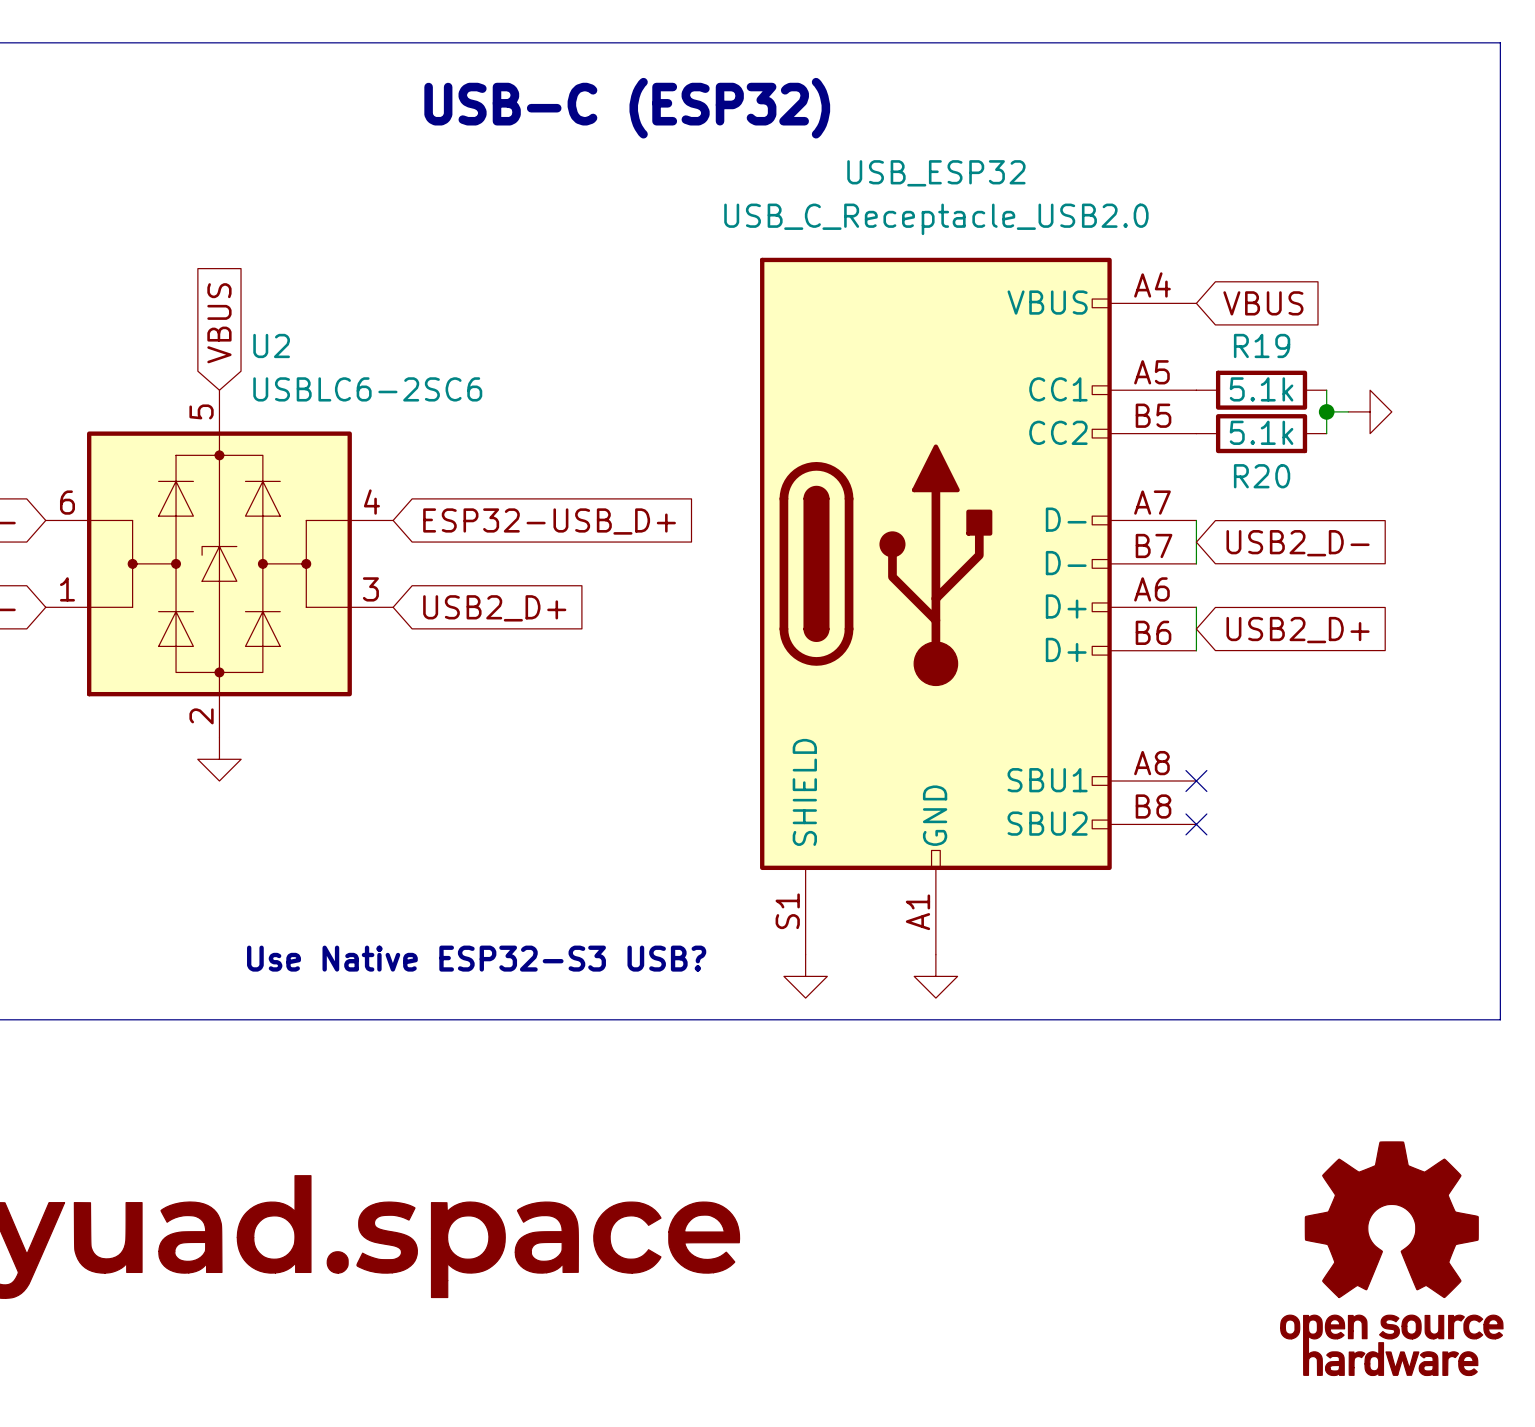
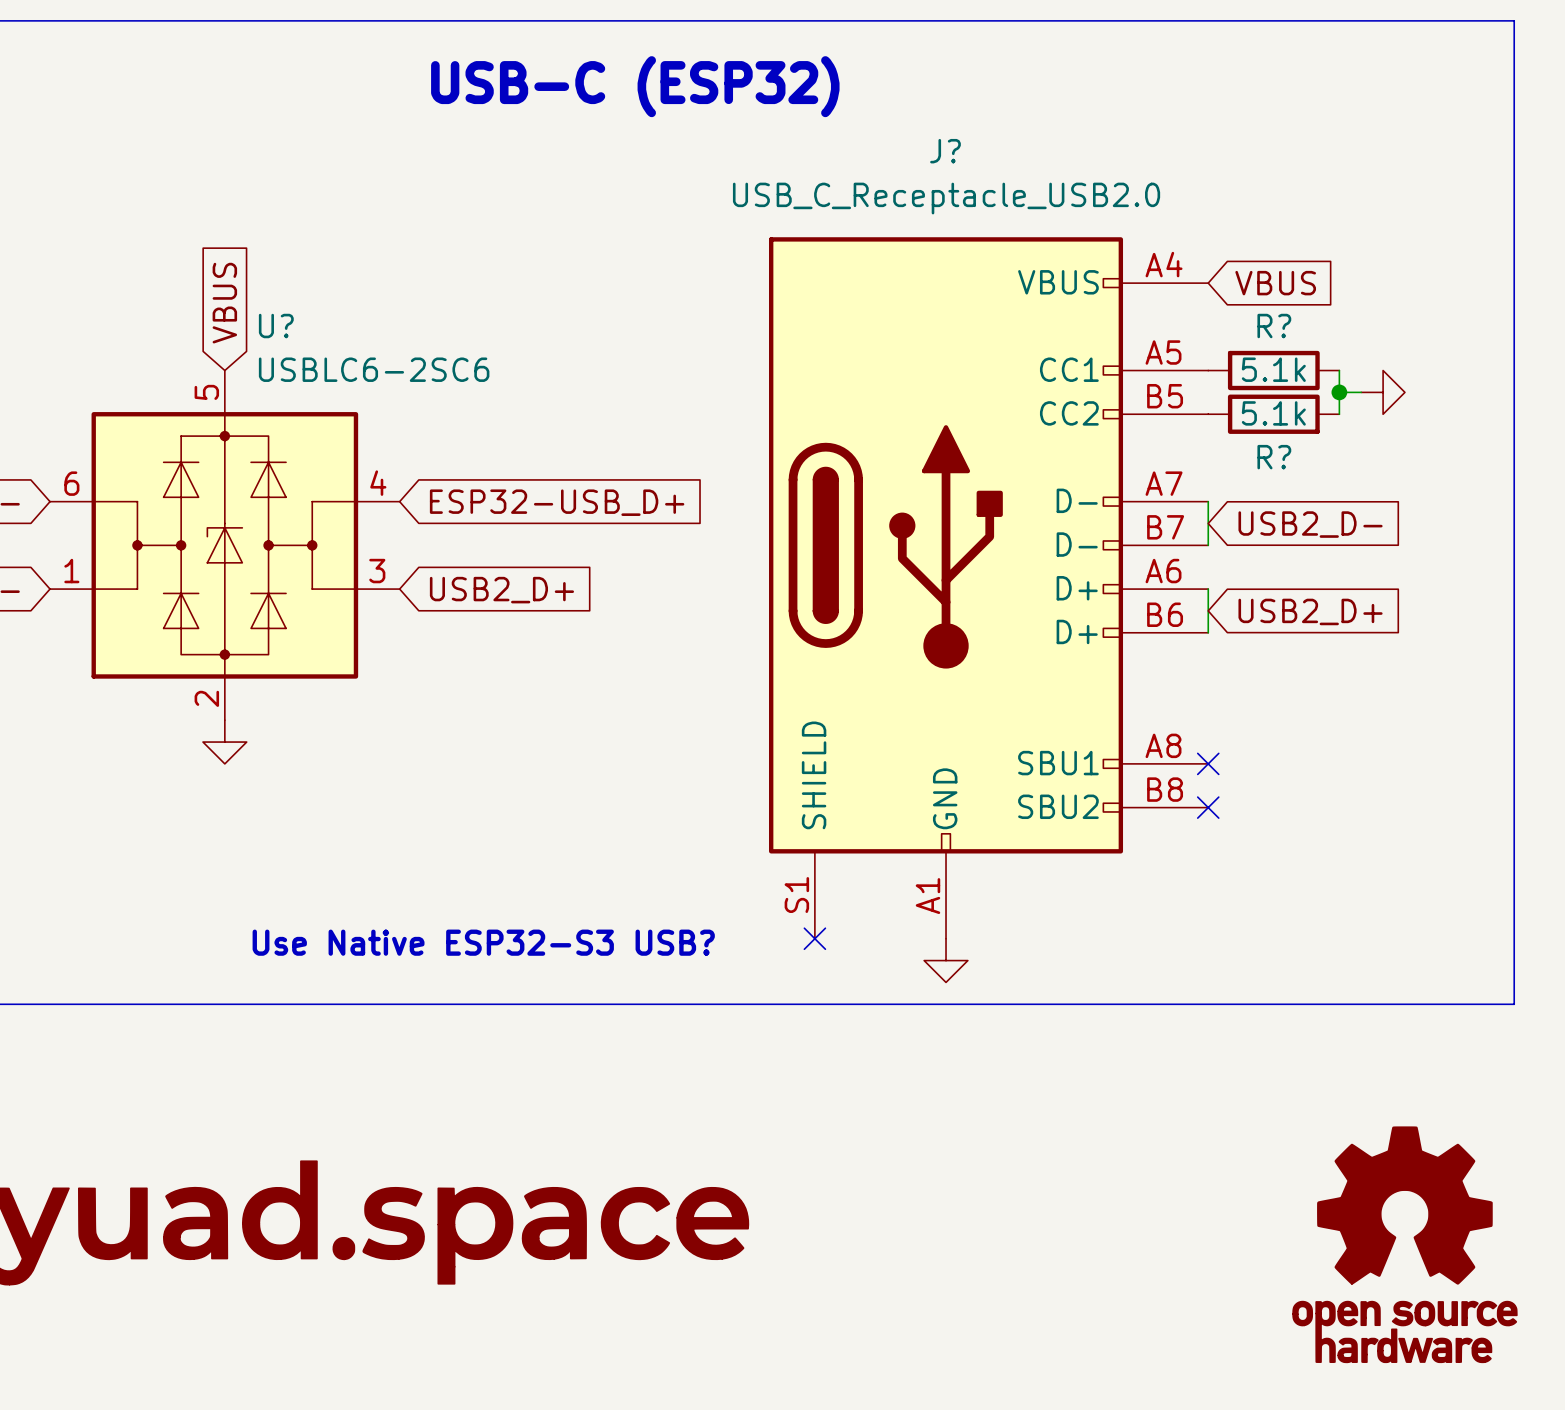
USB_ESP32 name: USB_ESP32 (936, 173) -> J? (945, 151)
U2 name: U2 (271, 345) -> U? (276, 326)
R19 name: R19 (1262, 345) -> R? (1274, 326)
R20 name: R20 (1262, 476) -> R? (1274, 457)
no-connect mark: none -> (814, 938)
power symbol: (805, 976) -> none

